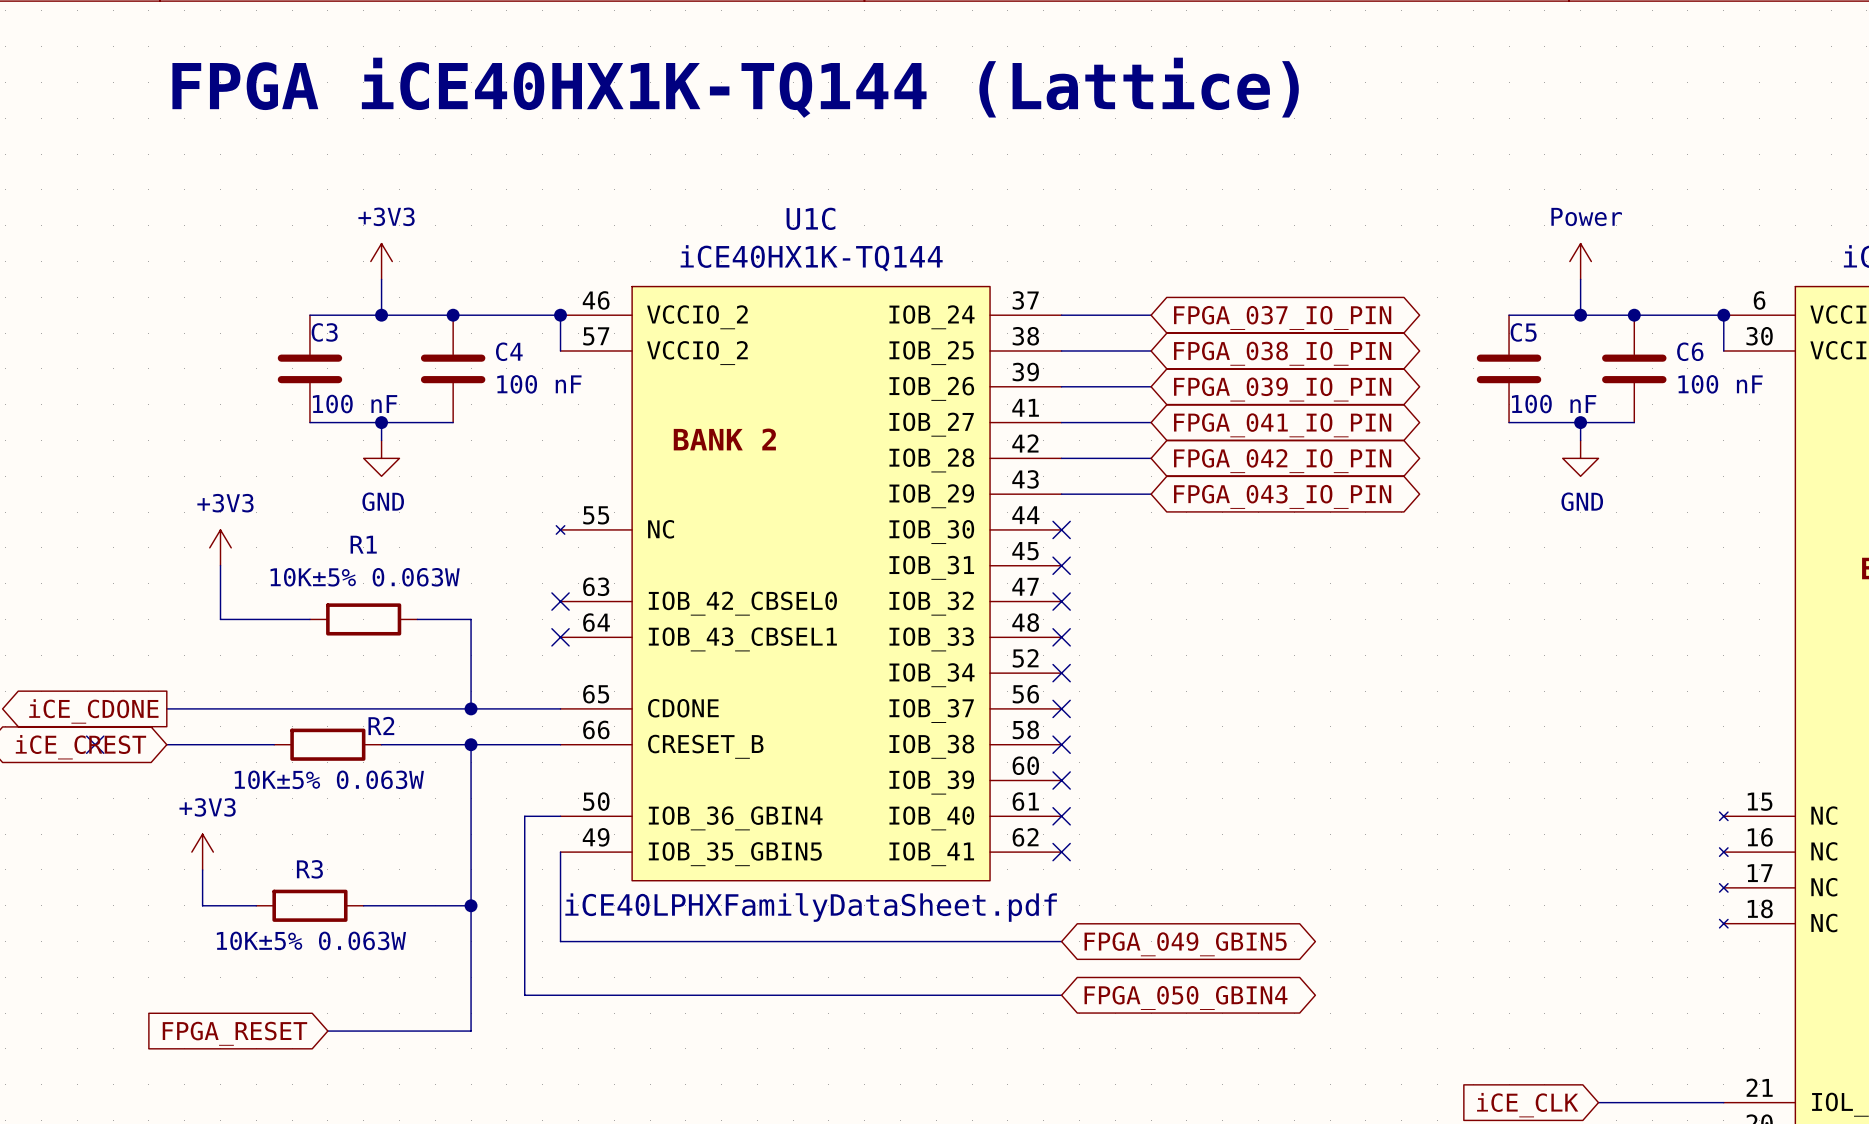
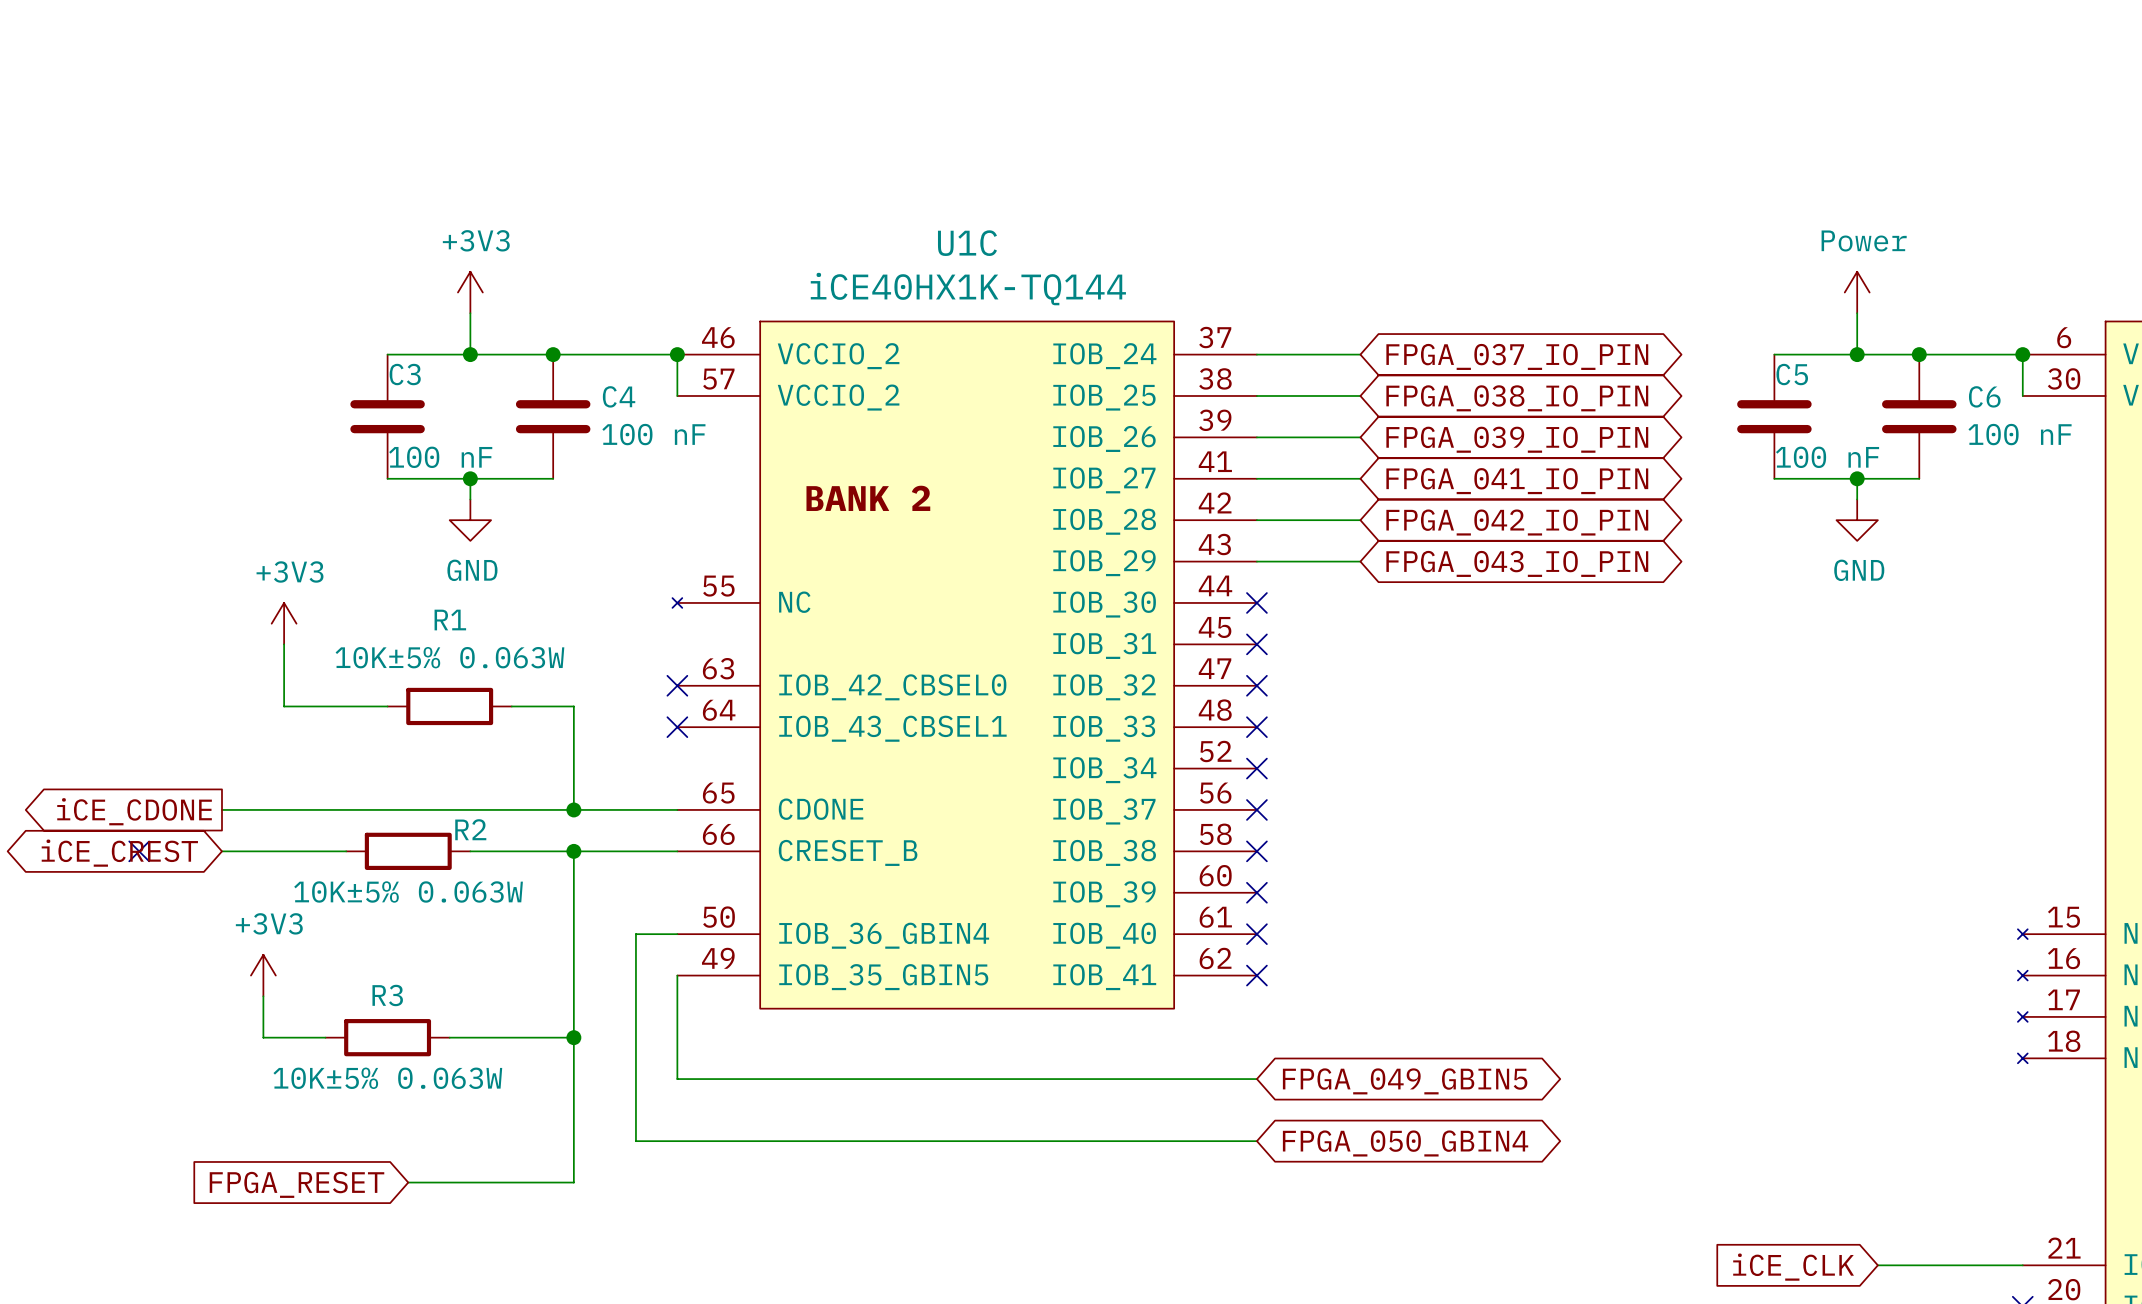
text: FPGA iCE40HX1K-TQ144 (Lattice) (735, 87) -> none
U1C text: iCE40LPHXFamilyDataSheet.pdf (811, 907) -> none

